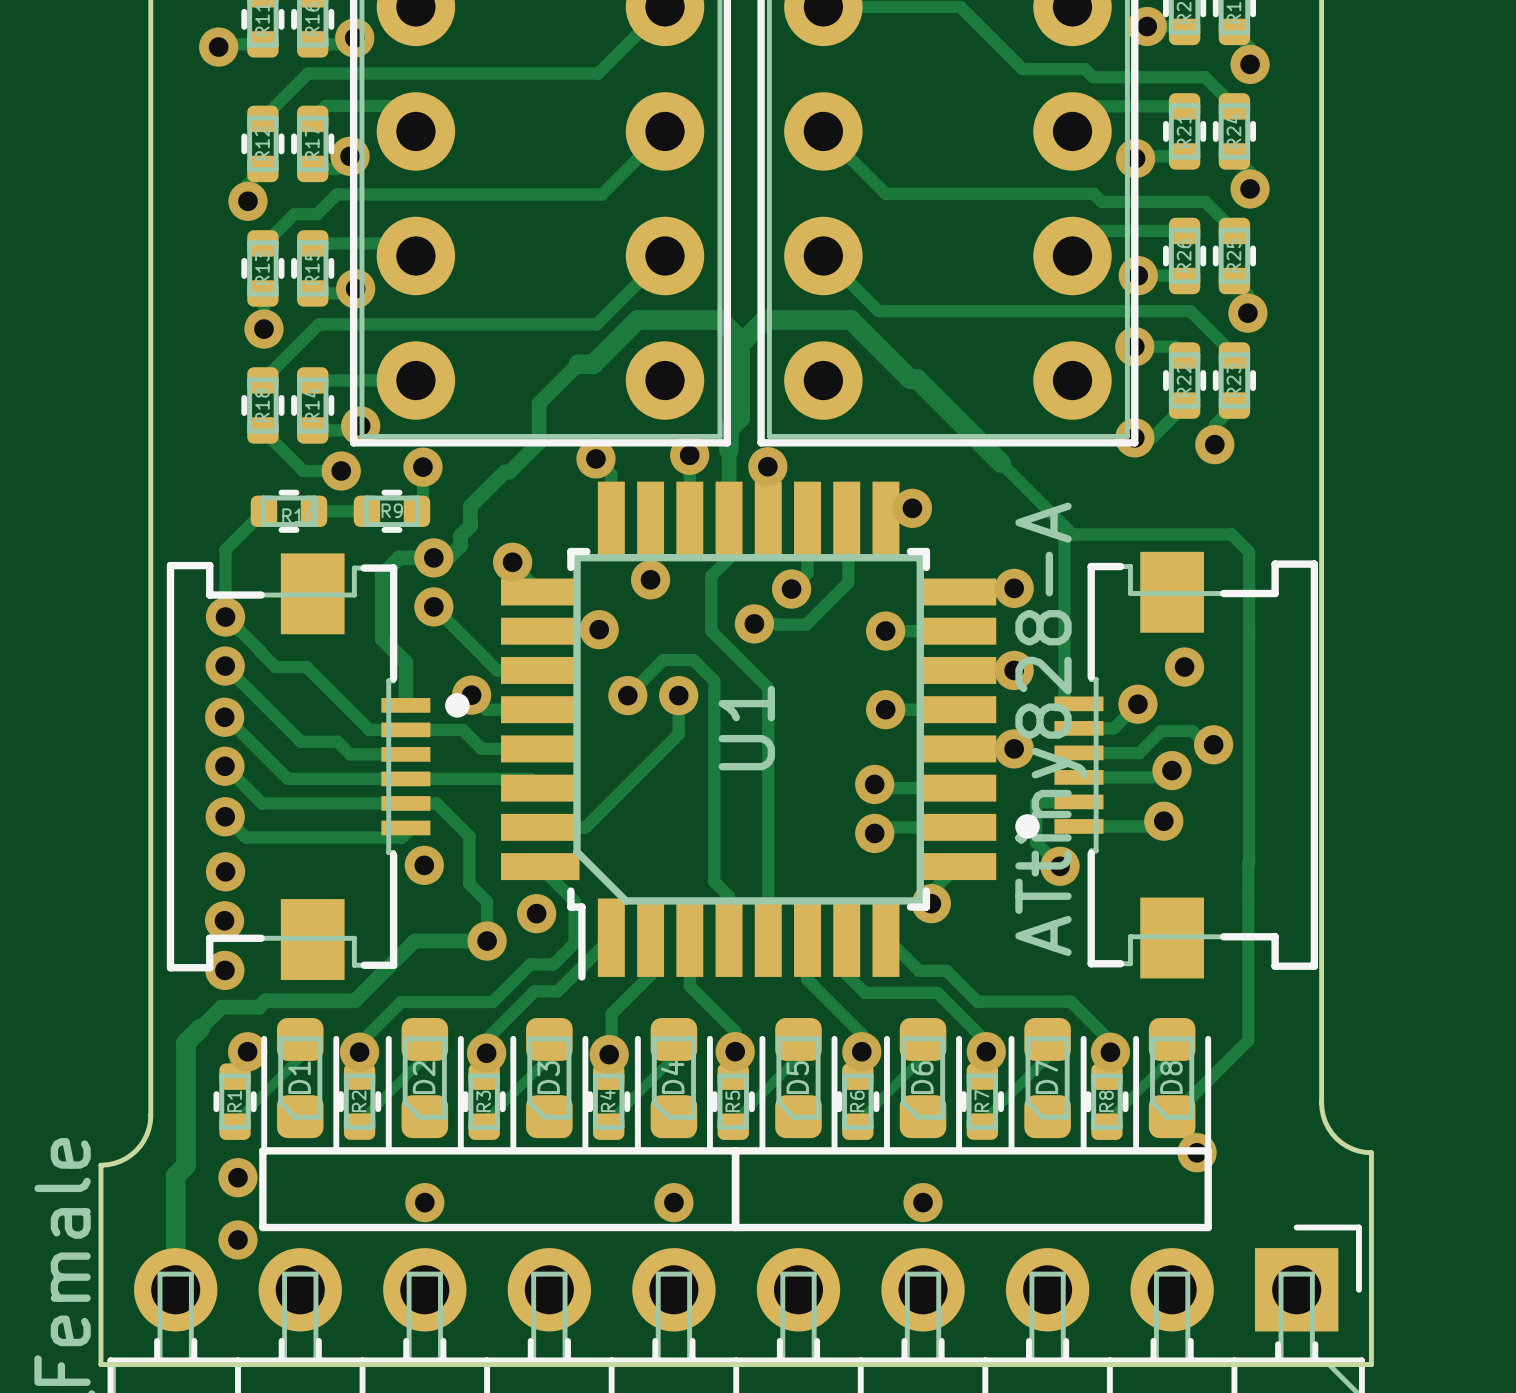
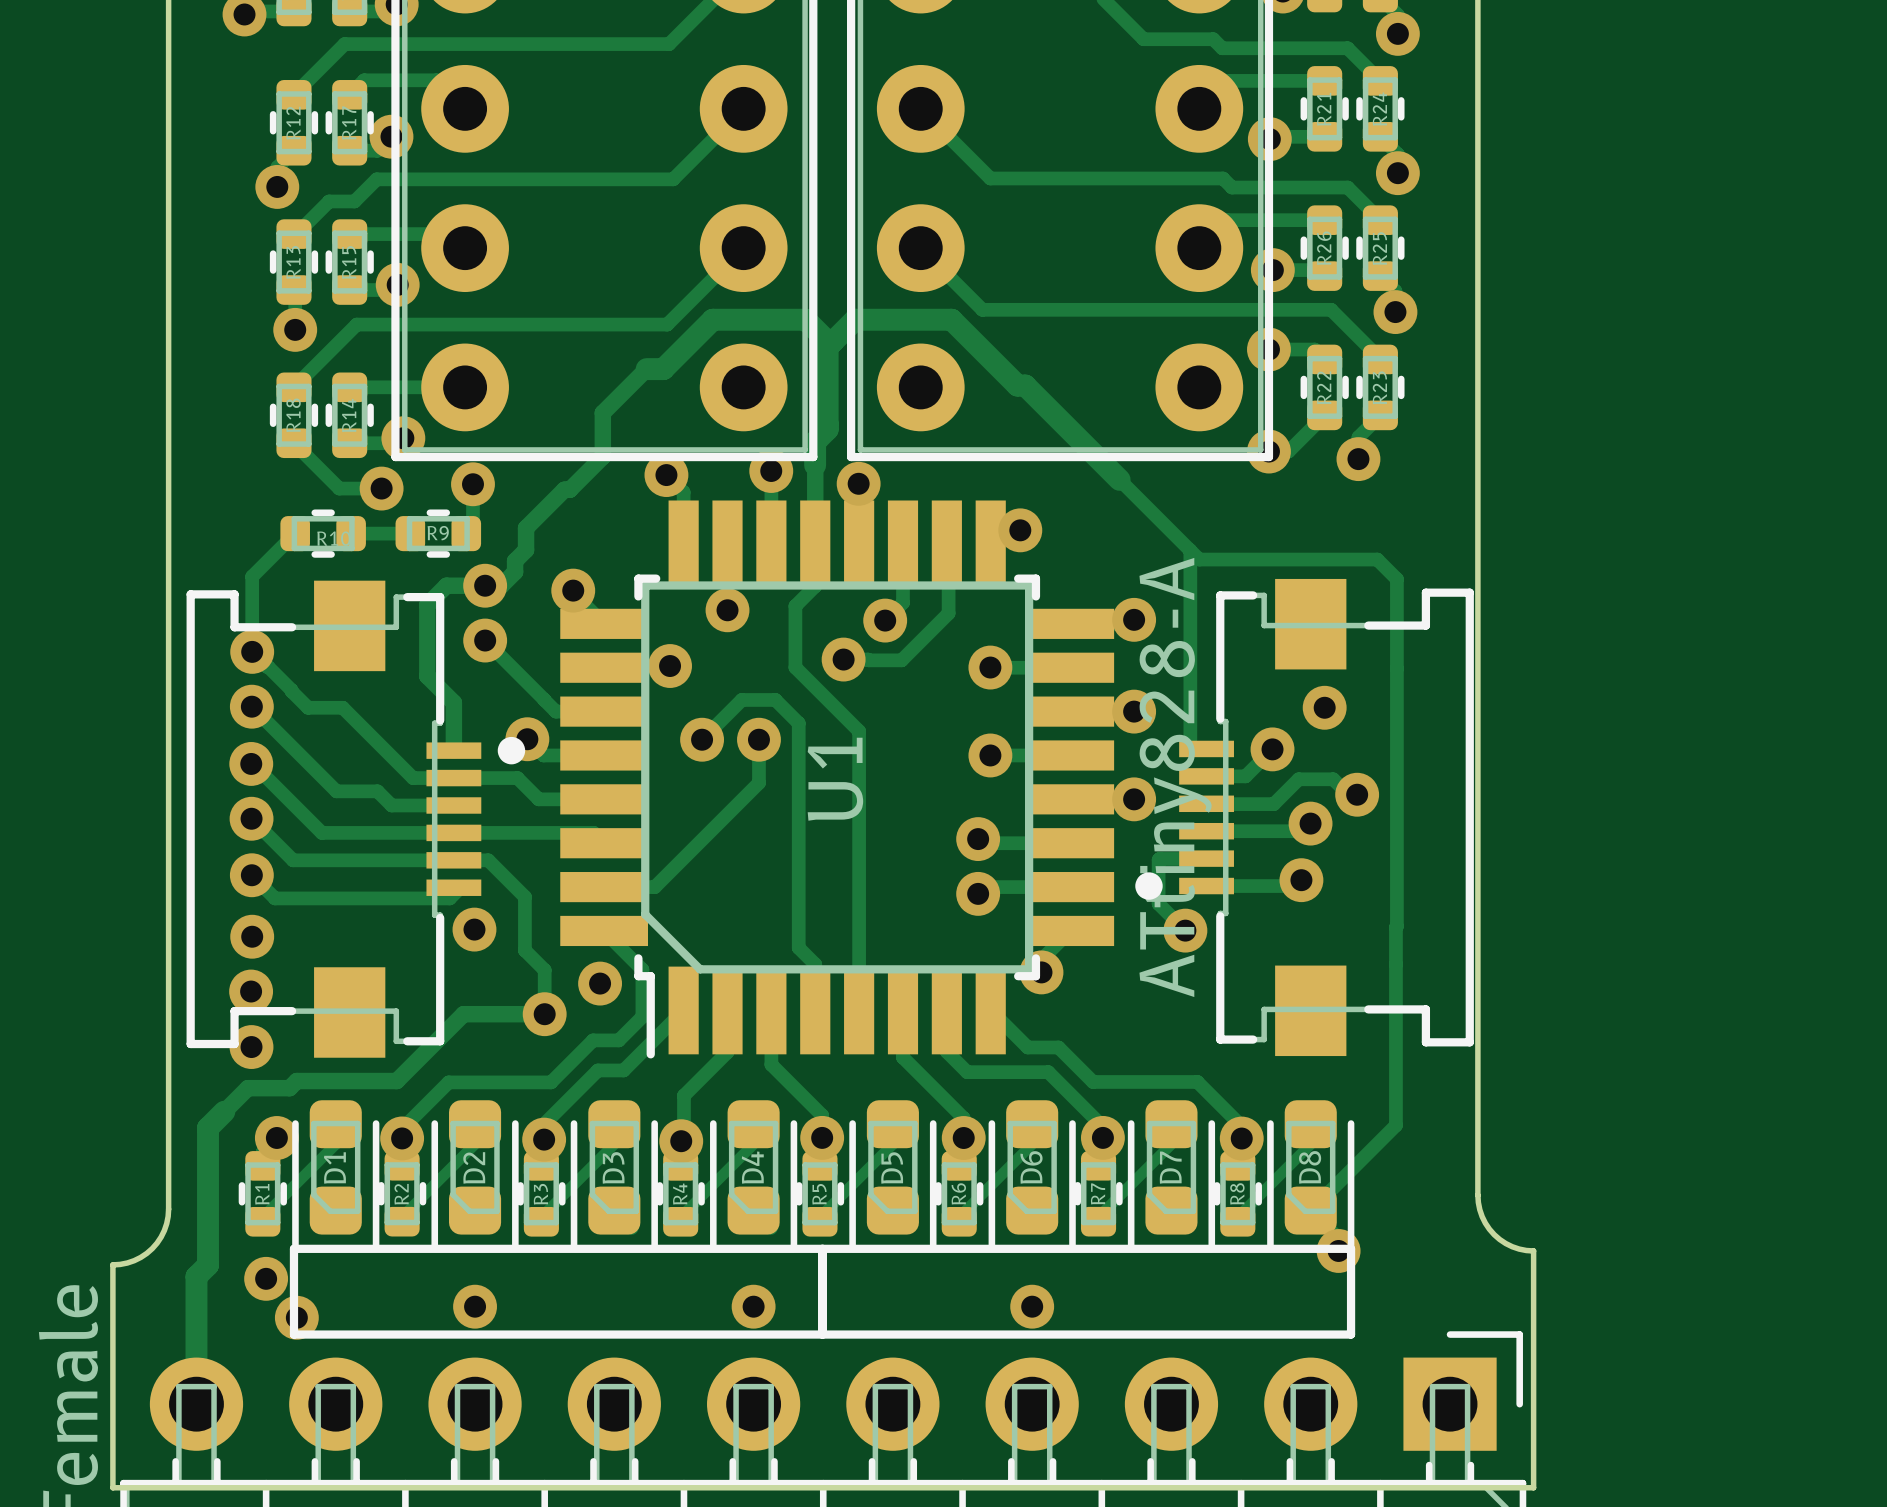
via position: (237, 1239) -> (296, 1317)

